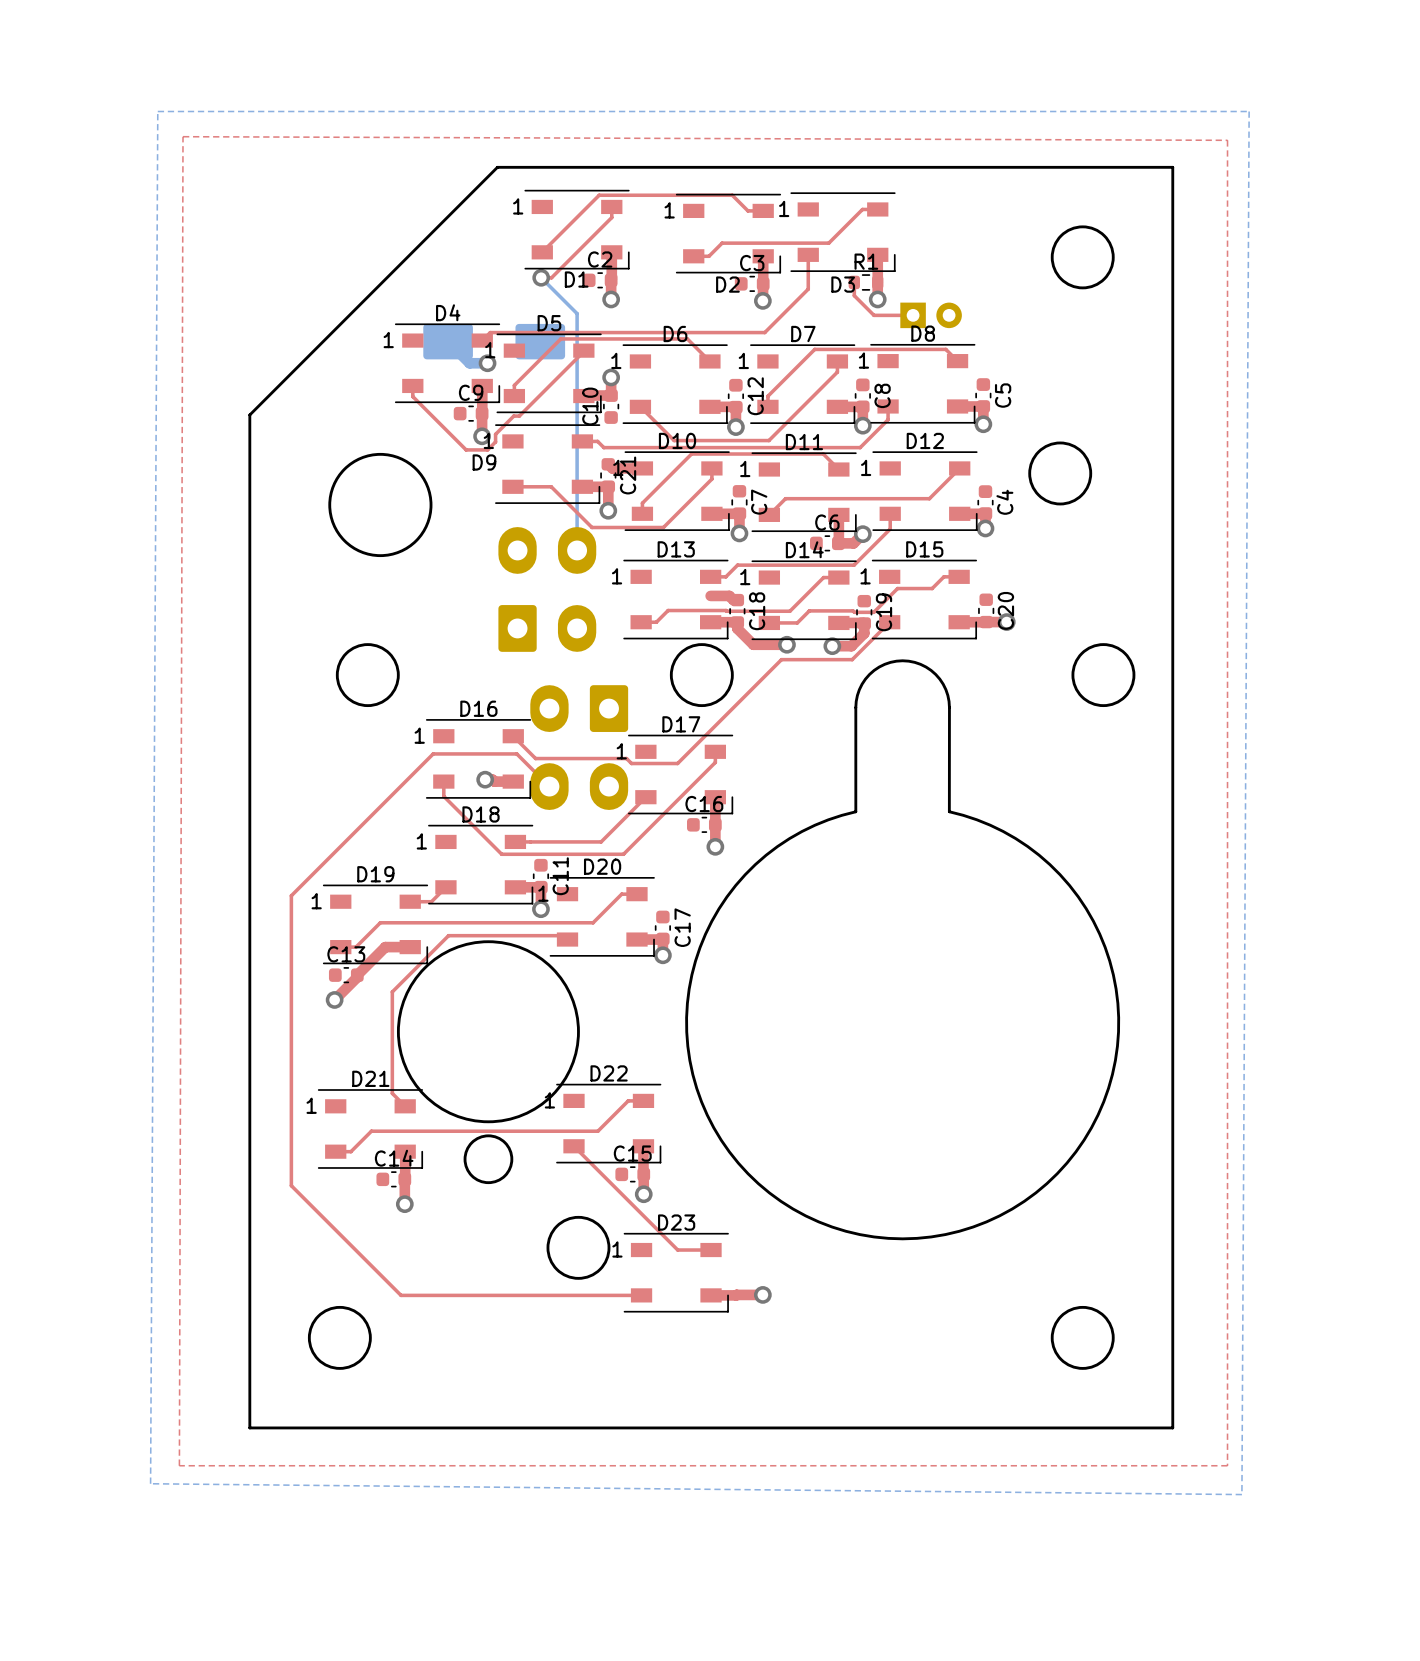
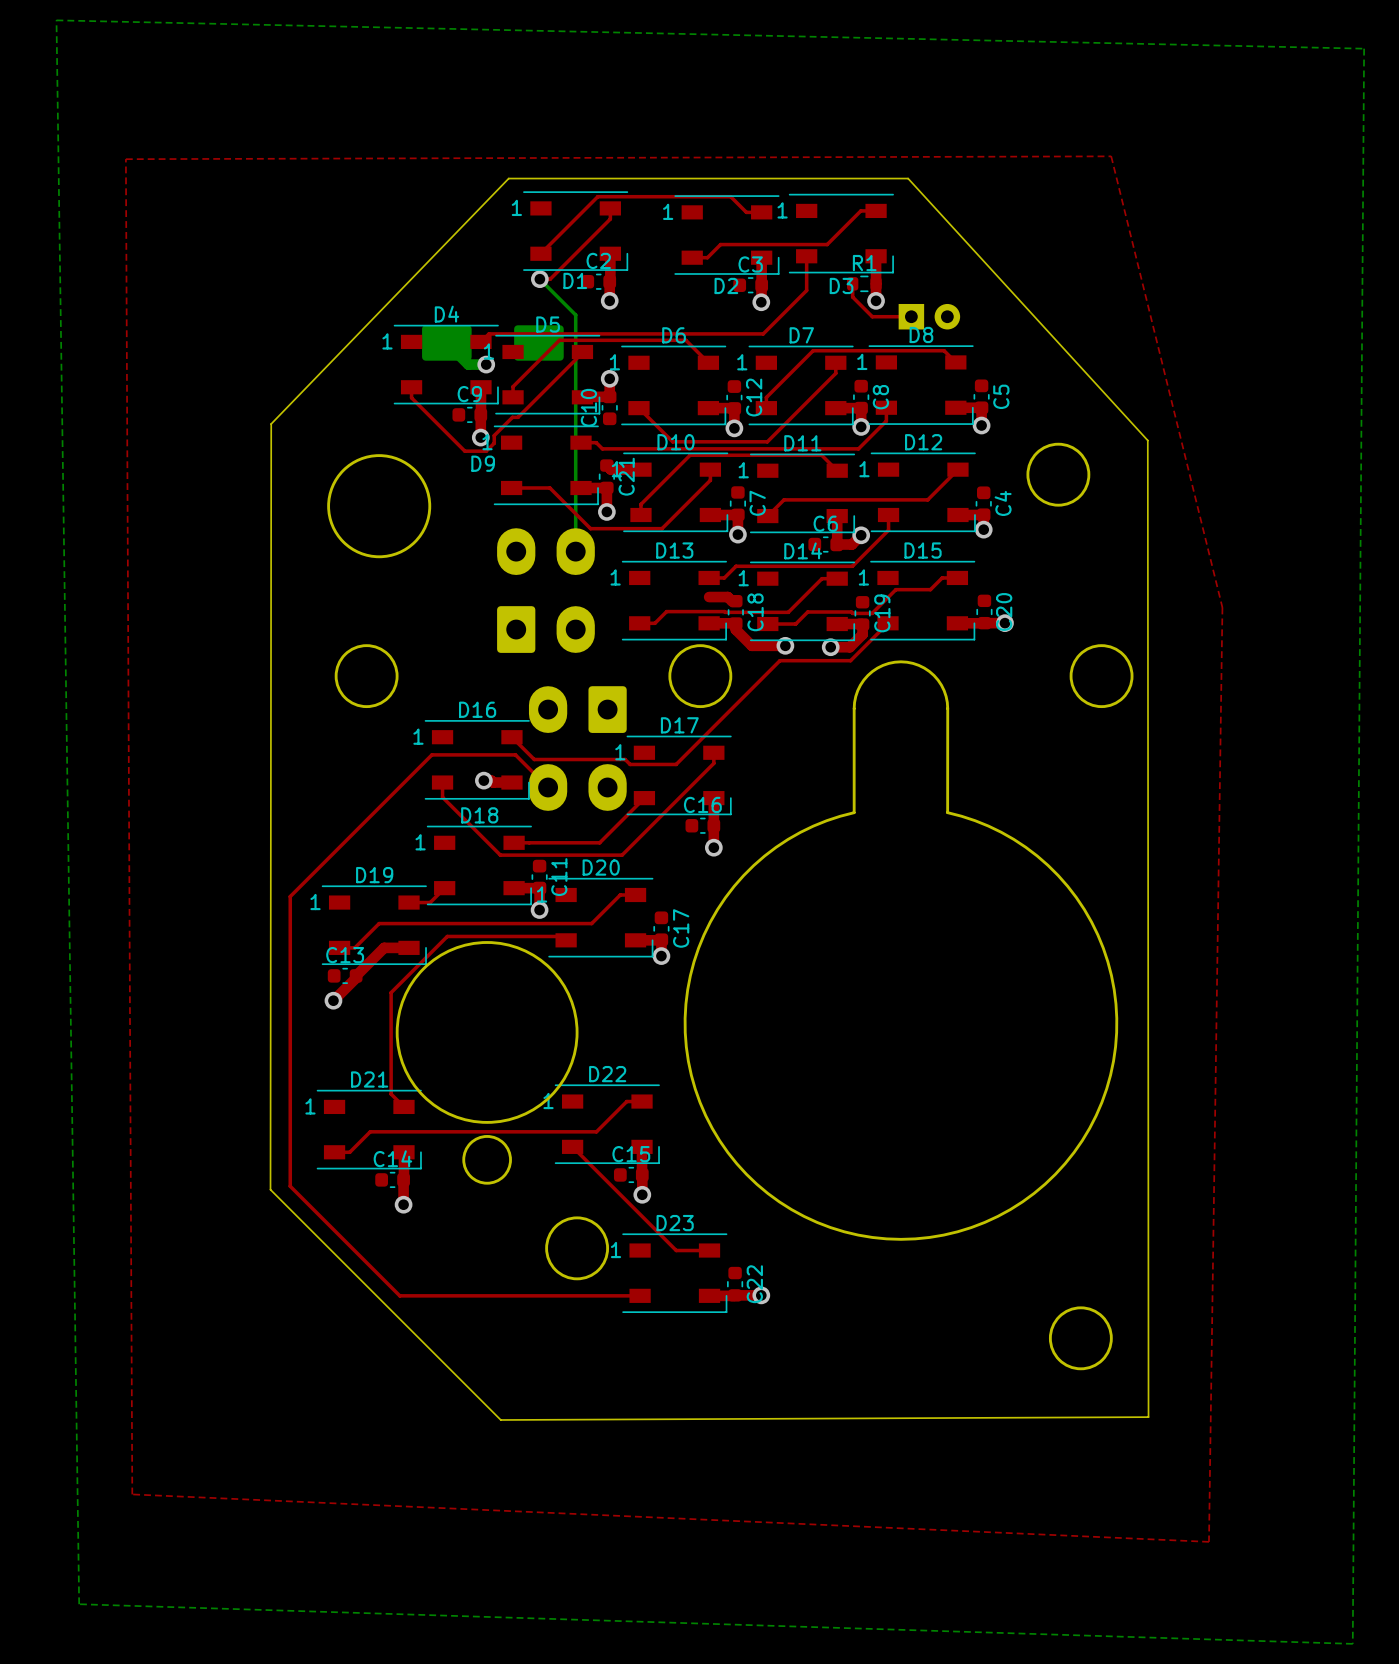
bottom zone outline: (157, 111) (150, 1483) (1241, 1494) (1249, 111) (157, 111) -> (56, 20) (79, 1604) (1352, 1643) (1364, 48) (56, 20)
top zone outline: (183, 136) (179, 1465) (1227, 1465) (1227, 140) (183, 136) -> (1111, 156) (125, 159) (132, 1494) (1208, 1541) (1222, 607) (1111, 156)
board edge: (497, 167) (1172, 167) (1172, 1427) (249, 1427) (249, 414) (497, 167) -> (508, 178) (271, 423) (270, 1189) (500, 1420) (1148, 1417) (1147, 440) (908, 178) (508, 178)
round board edge: [1050, 225, 1115, 290] -> none
C22: none -> (735, 1284)
round board edge: [307, 1305, 372, 1370] -> none

